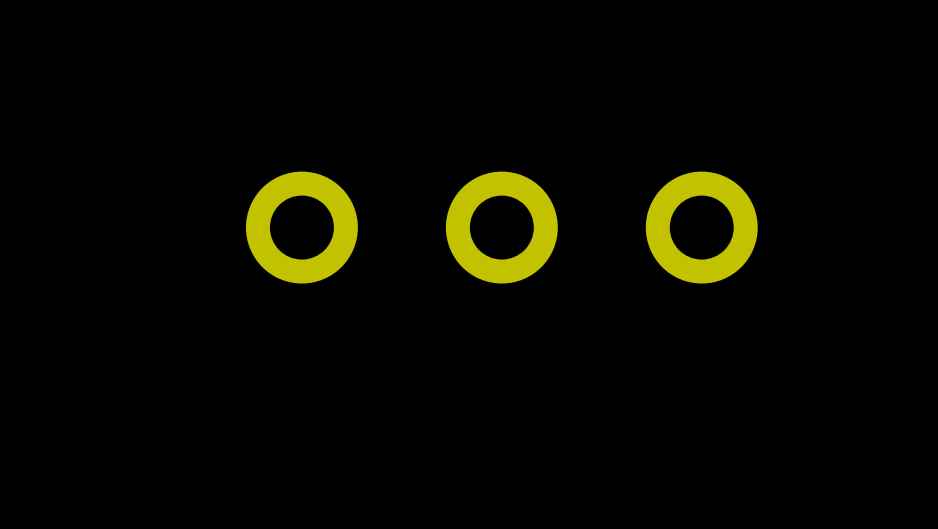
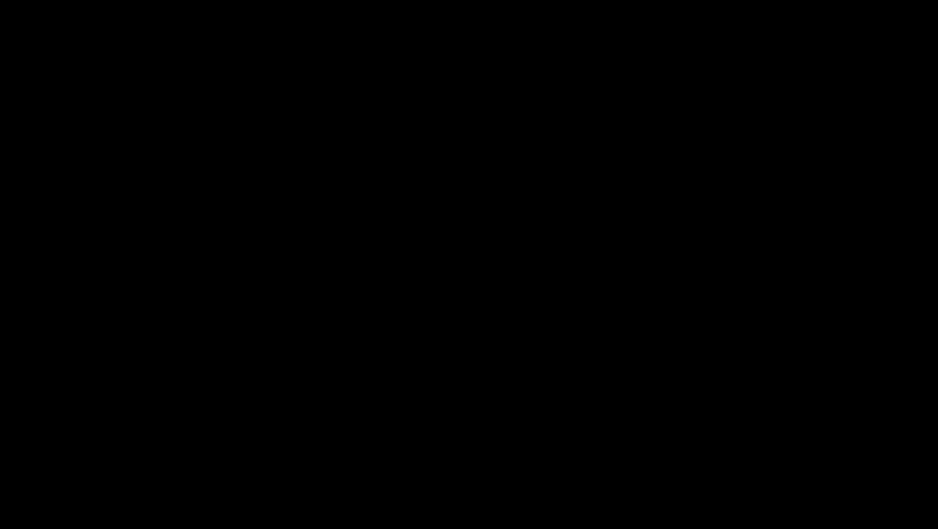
part: (501, 227) -> none

